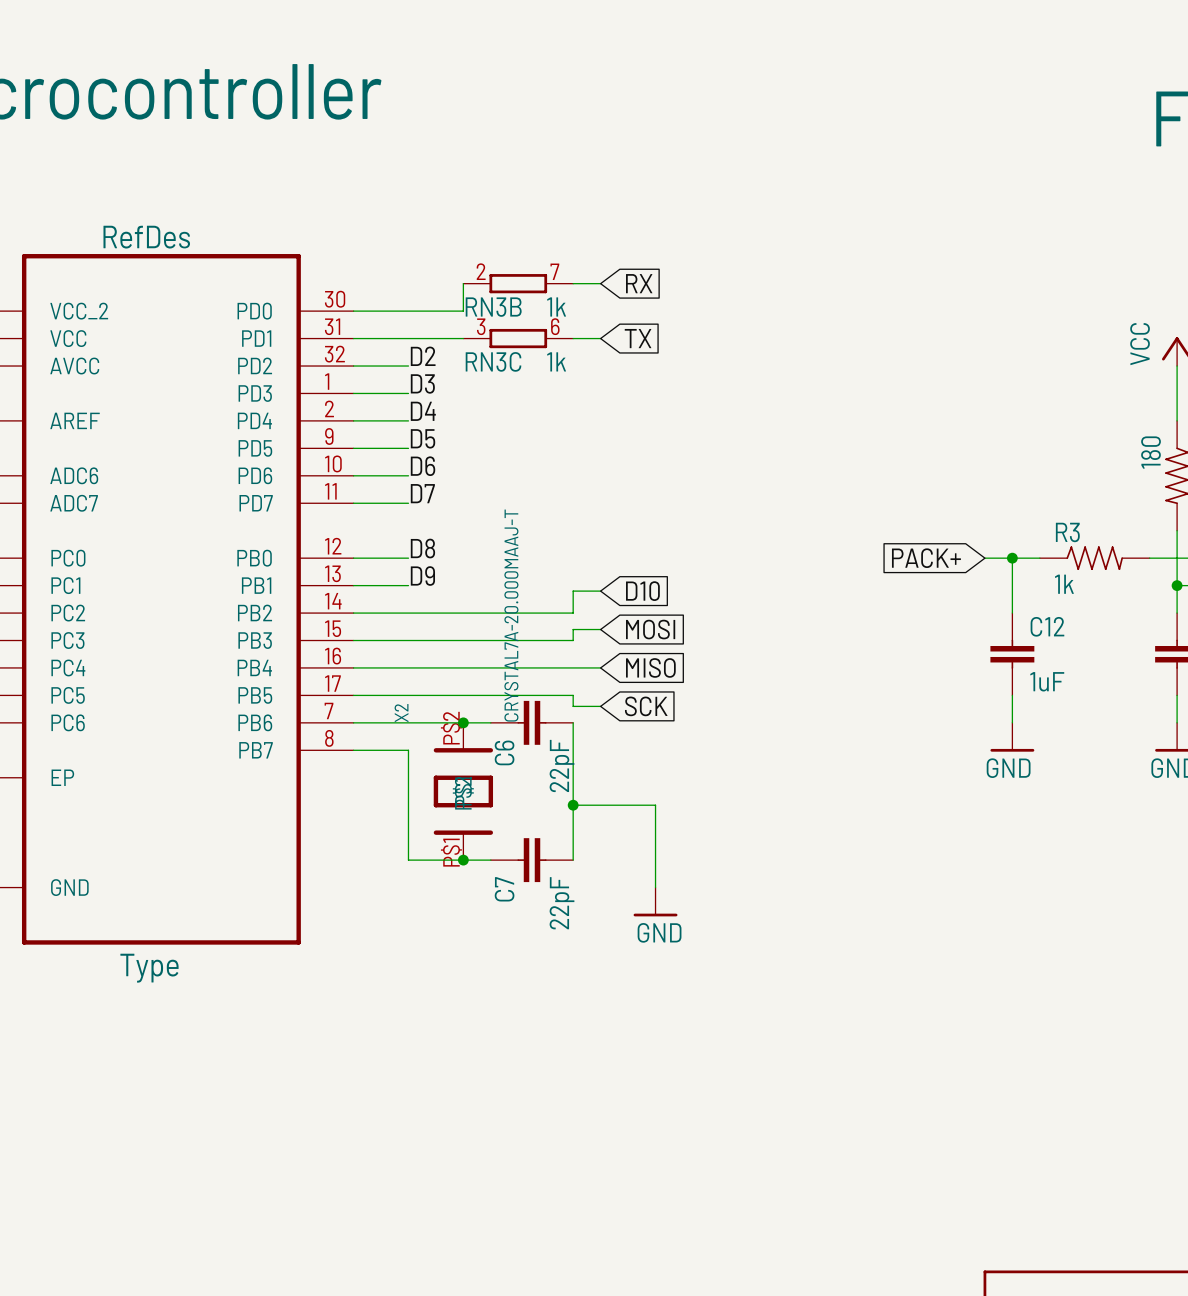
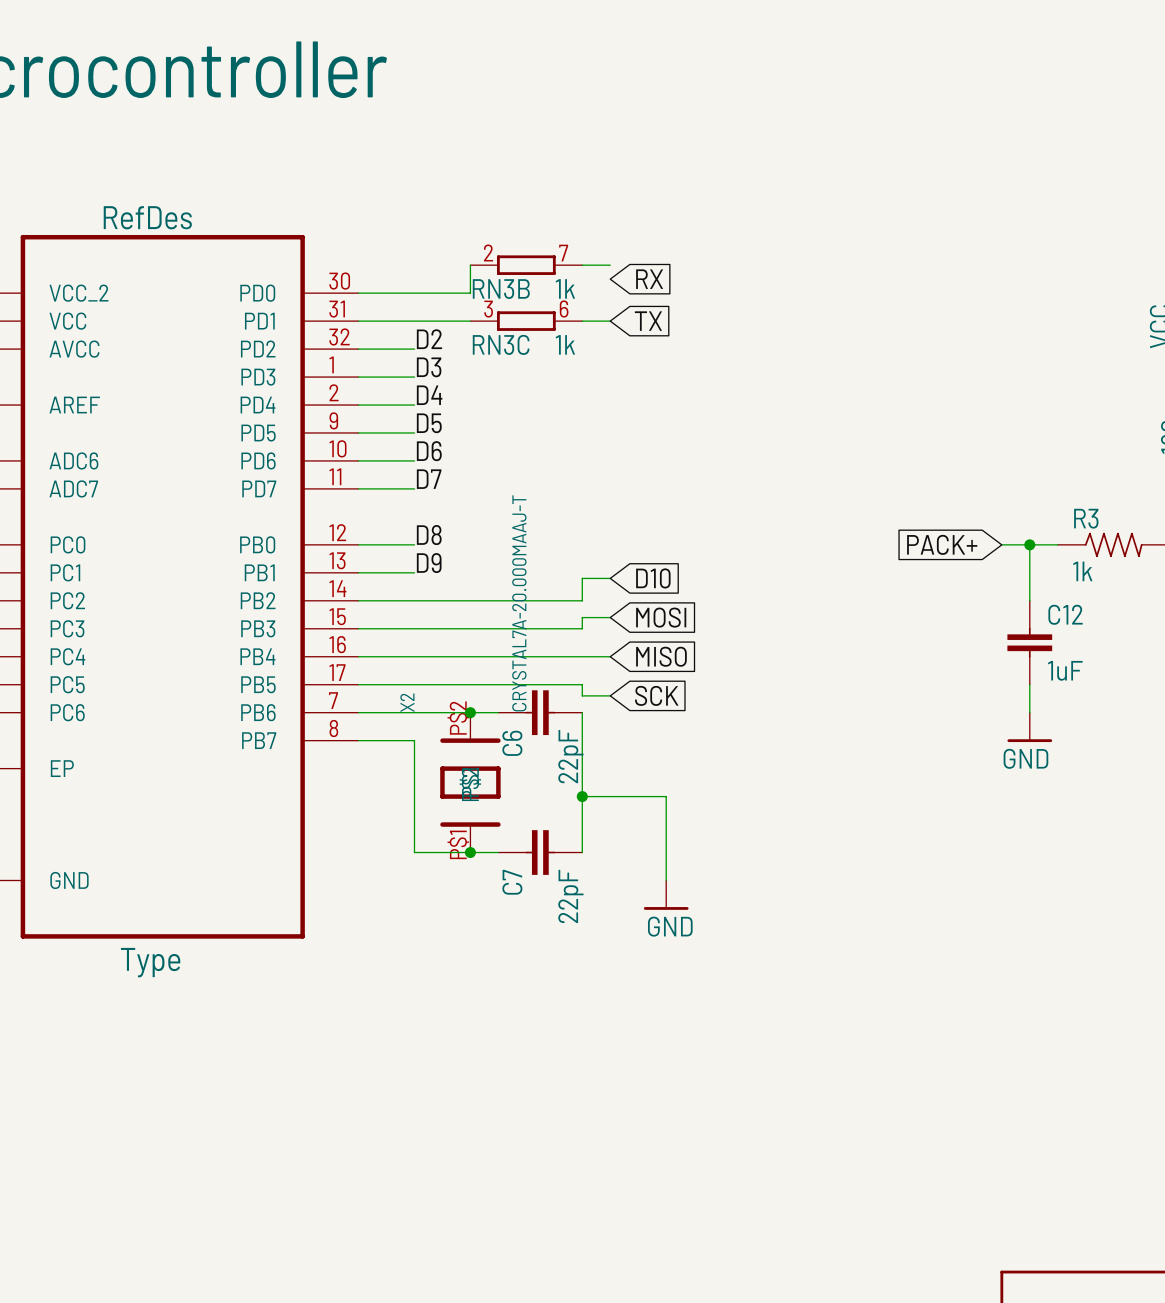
global label position: RX (639, 283) -> RX (649, 279)

